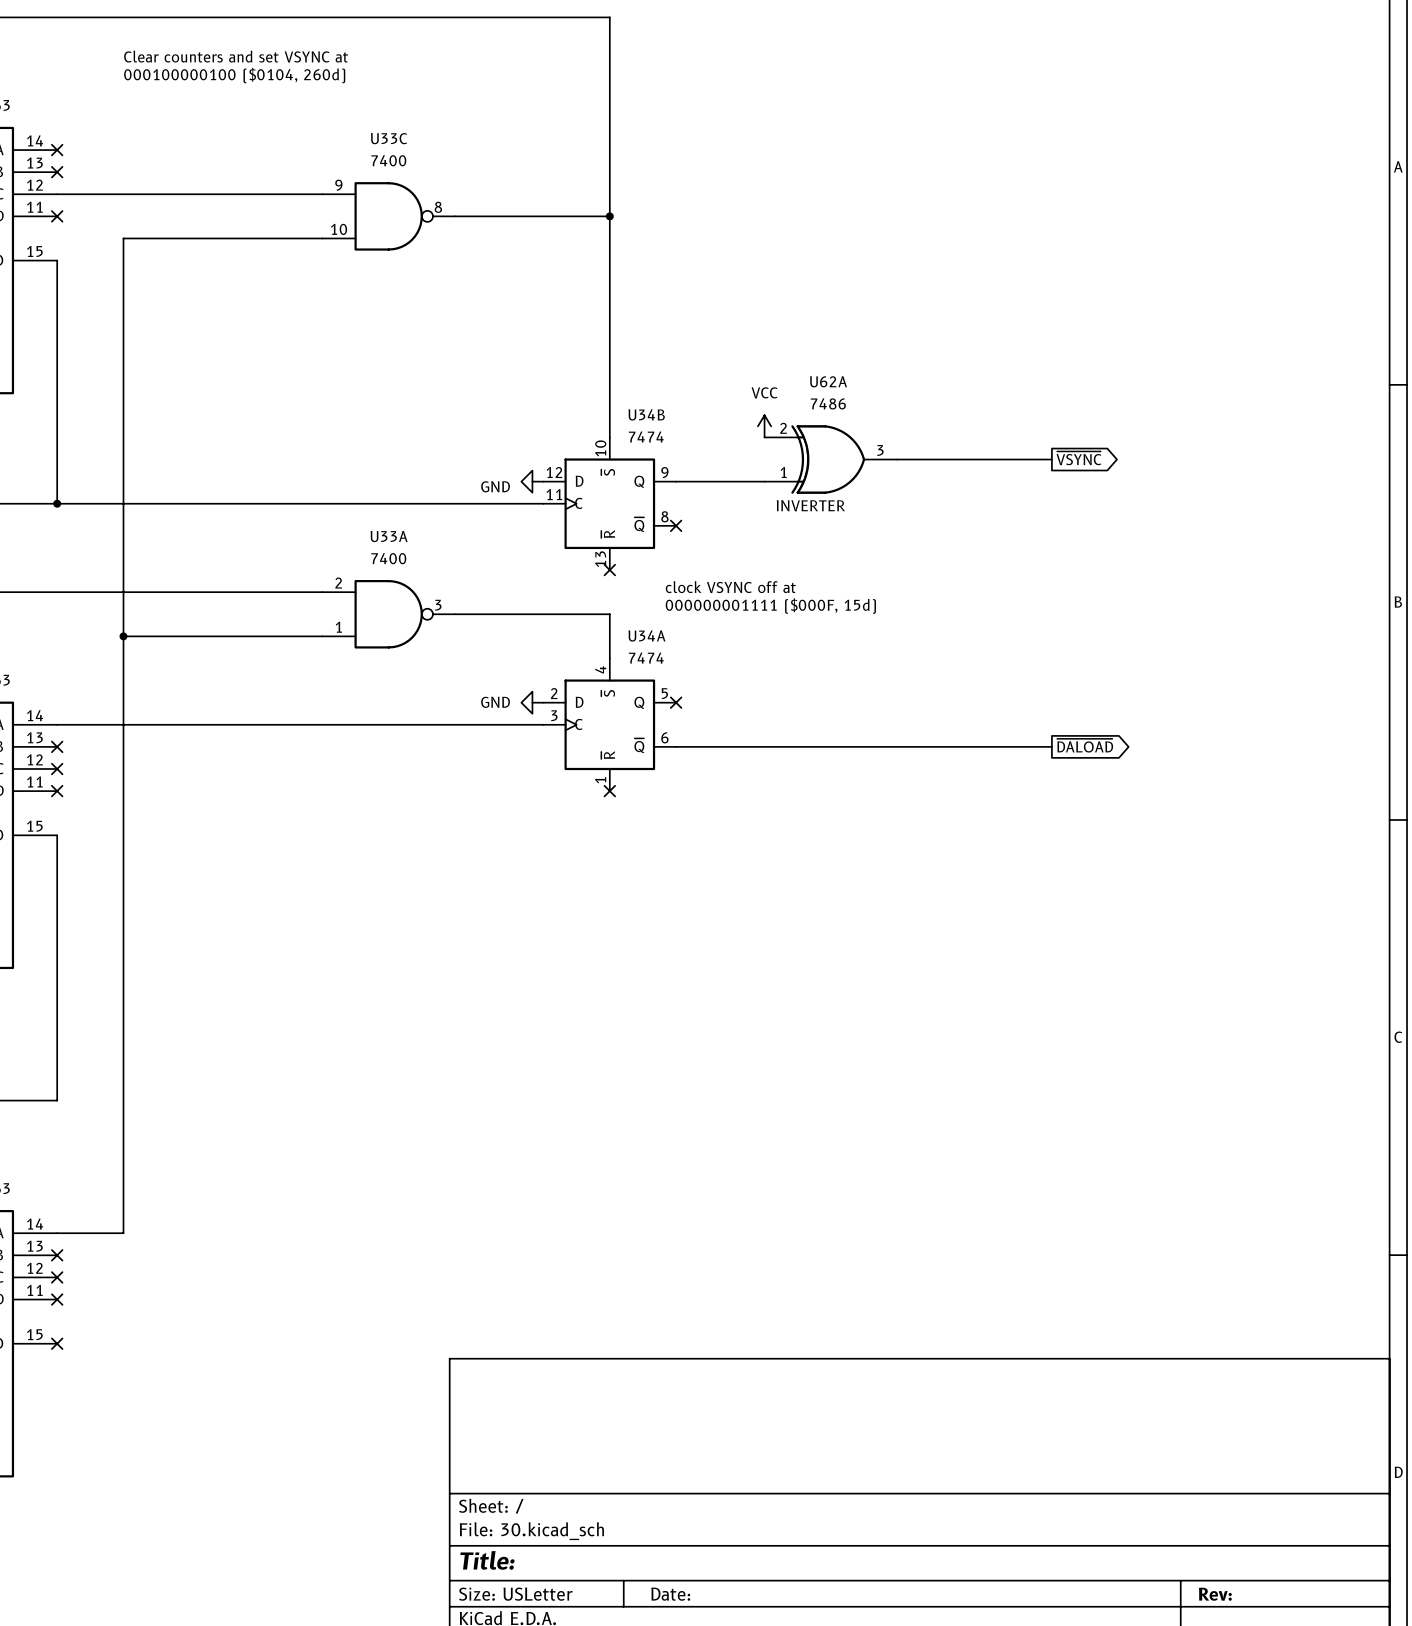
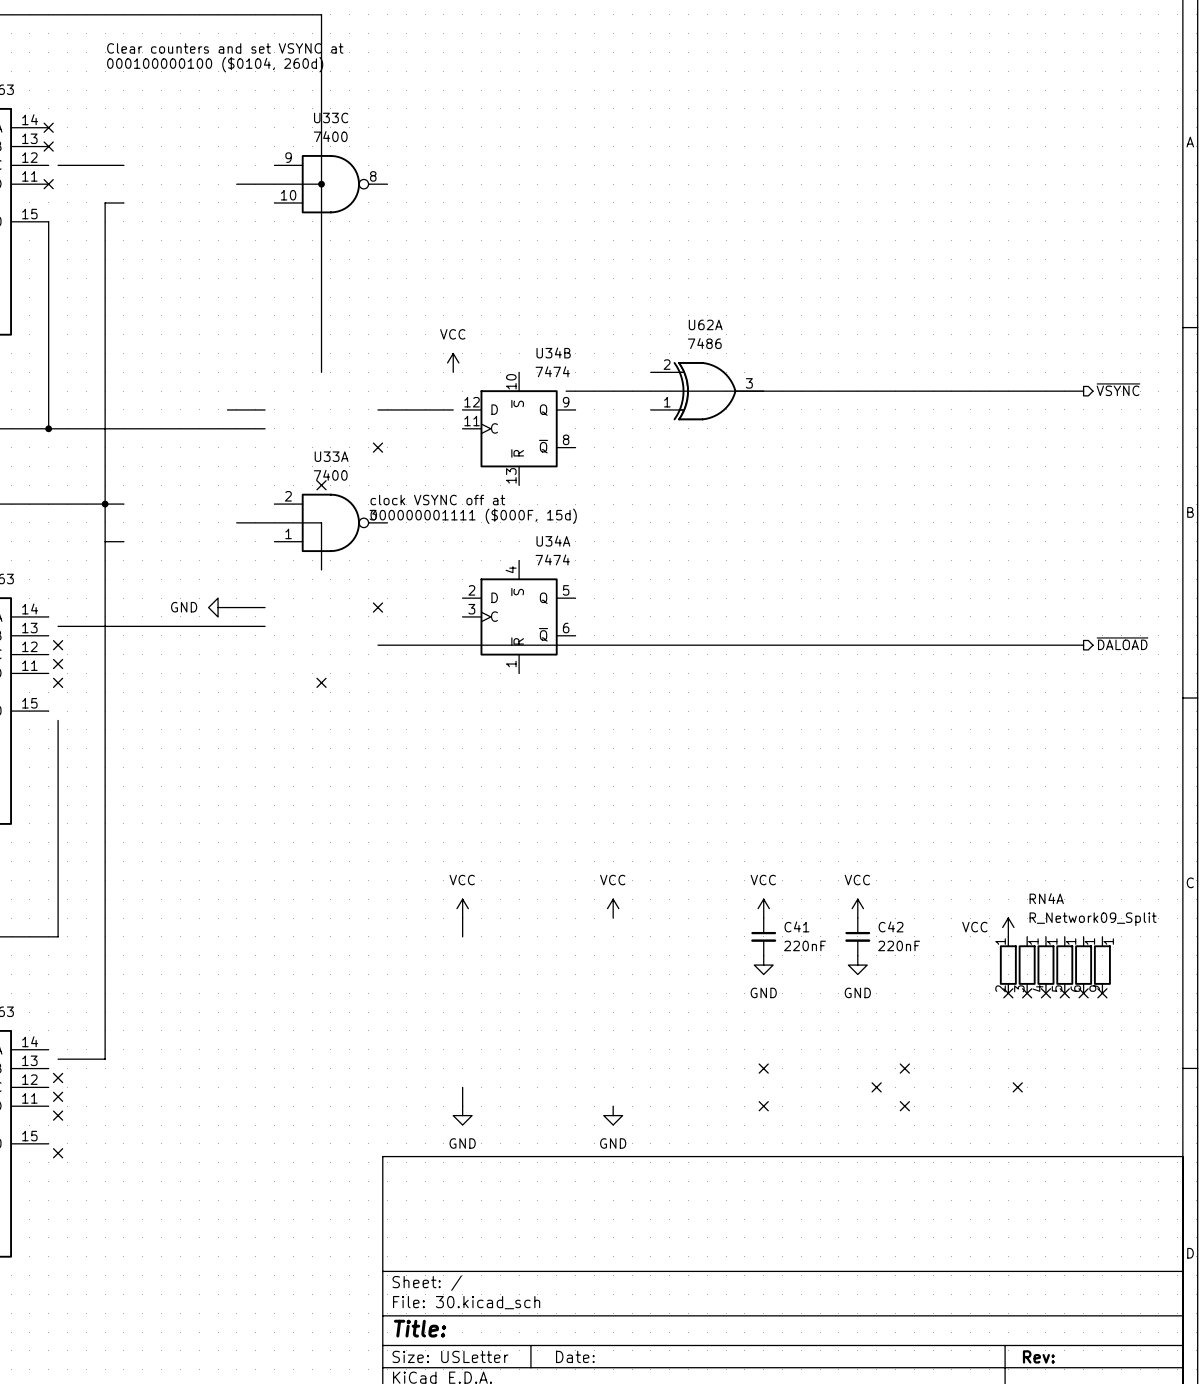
wire: (377, 17) (609, 17) (609, 437) -> (321, 14) (321, 372)
wire: (57, 194) (68, 194) -> none
wire: (145, 194) (322, 194) -> none
wire: none -> (236, 184) (321, 184)
junction: none -> (321, 184)
wire: (455, 216) (609, 216) -> none
junction: (609, 216) -> none
wire: (145, 238) (322, 238) -> none
power symbol: none -> VCC (453, 362)
power symbol: VCC (764, 426) -> none
hierarchical label: none -> ~{VSYNC} (1118, 389)
global label: ~{VSYNC} (1078, 458) -> none
wire: none -> (566, 391) (763, 391)
wire: none -> (895, 391) (1083, 391)
wire: none -> (227, 409) (265, 409)
wire: none -> (377, 409) (453, 409)
power symbol: GND (532, 481) -> none
wire: (676, 481) (764, 481) -> none
wire: (311, 503) (543, 503) -> none
text: INVERTER (810, 505) -> none
no-connect mark: none -> (377, 447)
no-connect mark: (676, 525) -> none
no-connect mark: none -> (321, 485)
no-connect mark: (609, 570) -> none
text: none -> clock VSYNC off at (437, 500)
text: clock VSYNC off at (730, 587) -> none
wire: (145, 592) (322, 592) -> none
text: none -> 000000001111 ($000F, 15d) (473, 516)
text: 000000001111 ($000F, 15d) (770, 606) -> none
wire: none -> (236, 522) (321, 522) (321, 569)
wire: (455, 614) (609, 614) (609, 658) -> none
junction position: (123, 636) -> (105, 504)
wire: (145, 636) (322, 636) -> none
power symbol: GND (532, 702) -> none
no-connect mark: (676, 702) -> none
power symbol: none -> GND (218, 607)
wire: none -> (227, 607) (265, 607)
no-connect mark: none -> (377, 607)
wire: (57, 724) (543, 724) -> none
wire: none -> (58, 626) (265, 626)
global label: ~{DALOAD} (1085, 745) -> none
no-connect mark: (57, 746) -> none
wire: (676, 746) (1051, 746) -> none
hierarchical label: none -> ~{DALOAD} (1122, 643)
no-connect mark: none -> (58, 645)
wire: none -> (377, 645) (1083, 645)
no-connect mark: (57, 769) -> none
no-connect mark: none -> (58, 664)
no-connect mark: (57, 791) -> none
no-connect mark: (609, 791) -> none
no-connect mark: none -> (58, 682)
no-connect mark: none -> (321, 682)
wire: (57, 835) (57, 1100) -> (58, 720) (58, 936) (48, 936)
power symbol: none -> VCC (462, 908)
power symbol: none -> VCC (613, 908)
power symbol: none -> VCC (763, 908)
power symbol: none -> VCC (857, 908)
wire: none -> (462, 918) (462, 936)
power symbol: none -> VCC (1008, 927)
C41: none -> 220nF (763, 936)
C42: none -> 220nF (857, 936)
power symbol: none -> GND (763, 965)
power symbol: none -> GND (857, 965)
RN4A: none -> R_Network09_Split (1008, 965)
part: none -> (1027, 965)
part: none -> (1045, 965)
part: none -> (1064, 965)
part: none -> (1083, 965)
part: none -> (1102, 965)
no-connect mark: none -> (1008, 993)
no-connect mark: none -> (1027, 993)
no-connect mark: none -> (1045, 993)
no-connect mark: none -> (1064, 993)
no-connect mark: none -> (1083, 993)
no-connect mark: none -> (1102, 993)
wire: (57, 1233) (123, 1233) -> (58, 1059) (105, 1059) (105, 1049)
no-connect mark: (57, 1255) -> none
no-connect mark: none -> (763, 1068)
no-connect mark: none -> (904, 1068)
no-connect mark: none -> (58, 1077)
no-connect mark: (57, 1277) -> none
wire: none -> (462, 1087) (462, 1106)
no-connect mark: none -> (876, 1087)
no-connect mark: none -> (1017, 1087)
no-connect mark: none -> (58, 1096)
no-connect mark: (57, 1299) -> none
no-connect mark: none -> (763, 1106)
no-connect mark: none -> (904, 1106)
no-connect mark: none -> (58, 1115)
power symbol: none -> GND (462, 1115)
power symbol: none -> GND (613, 1115)
no-connect mark position: (57, 1343) -> (58, 1153)

